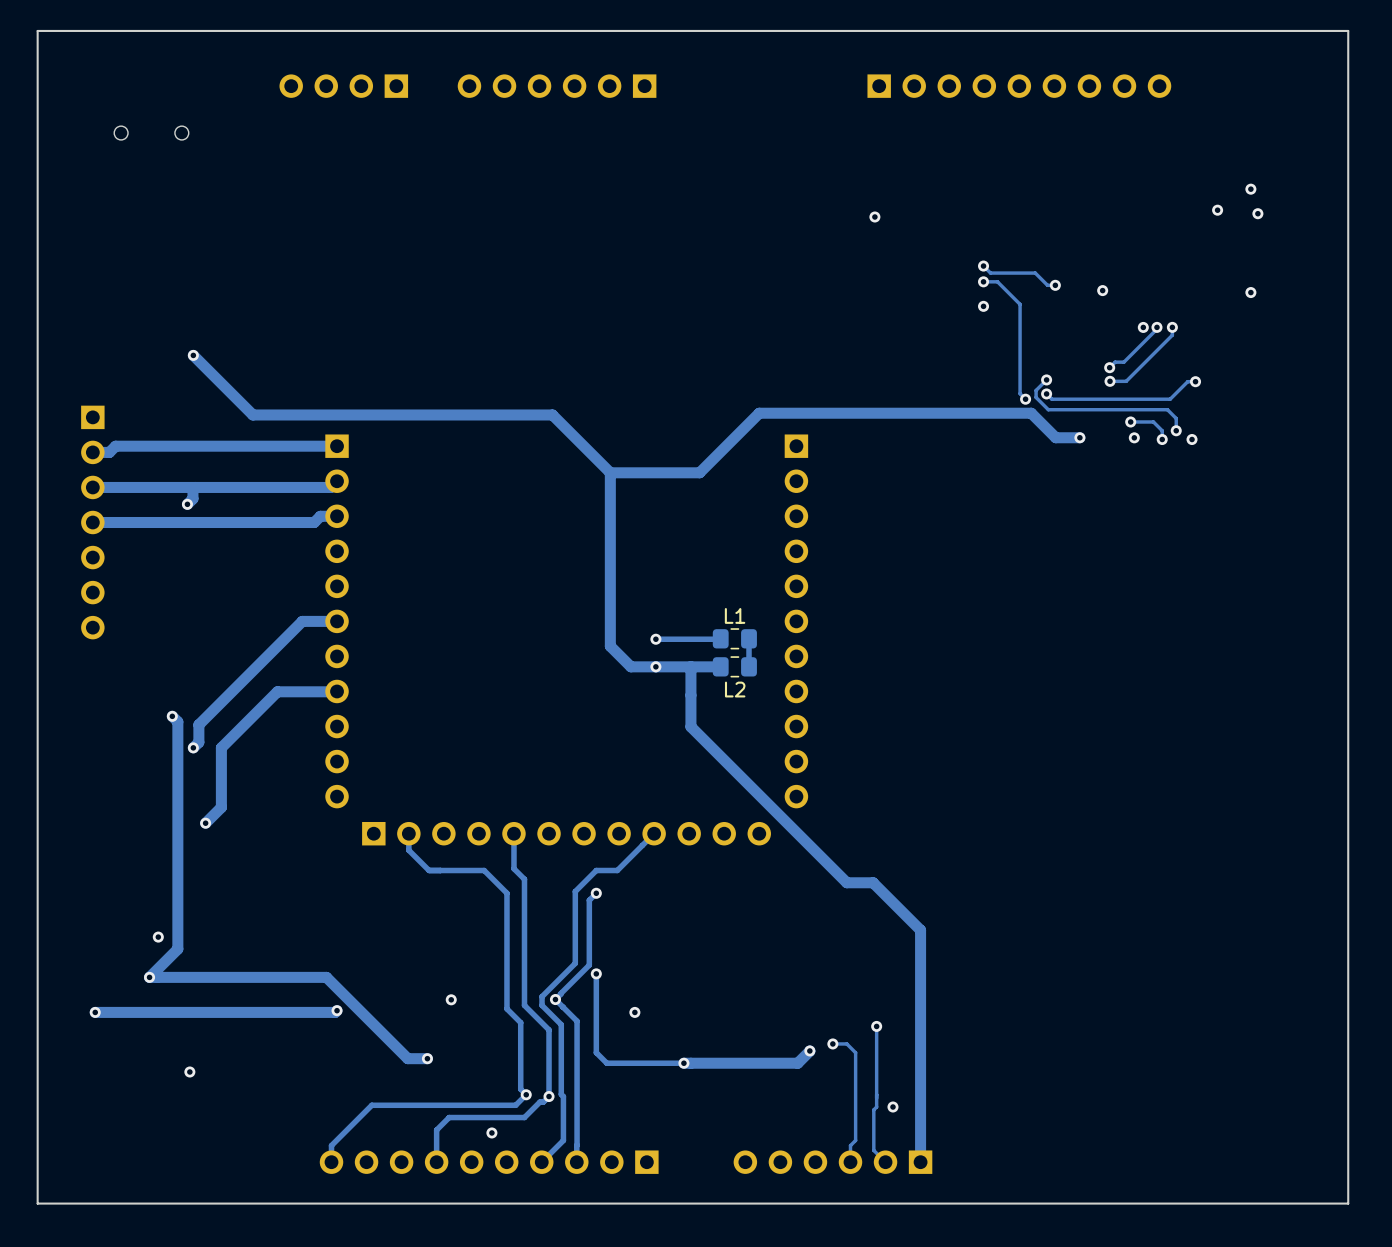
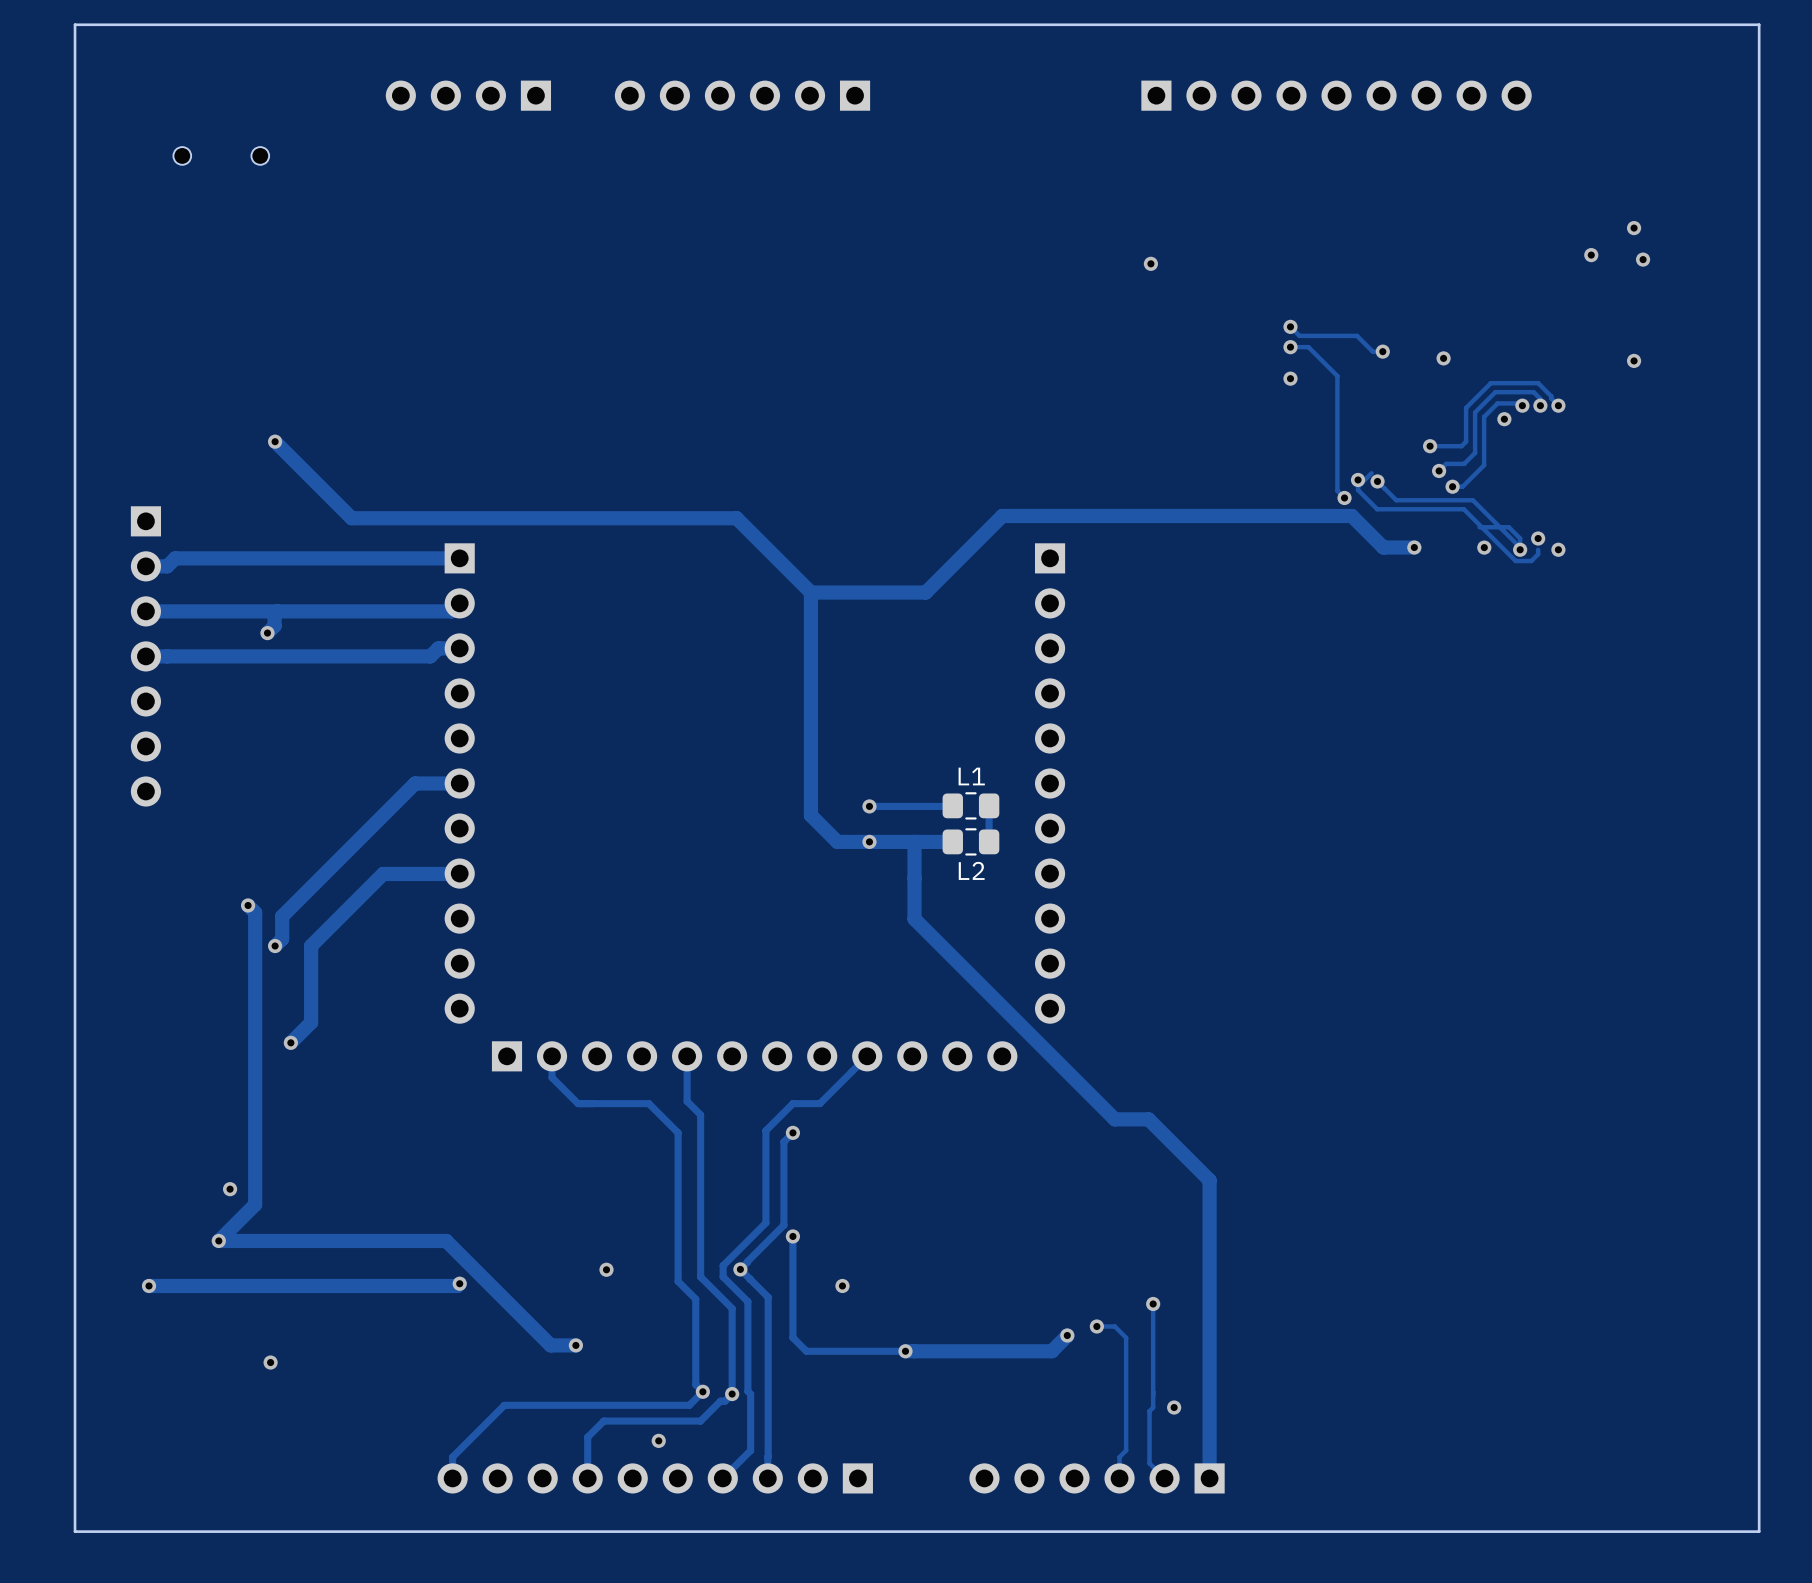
via: (1143, 327) -> none
track: (1156, 327) (1123, 362) (1115, 362) (1109, 367) -> none
via: (1156, 327) -> none
track: none -> (1522, 405) (1520, 403) (1497, 403) (1484, 416) (1484, 465) (1462, 486) (1452, 486)
via: none -> (1522, 405)
track: (1172, 327) (1172, 335) (1126, 381) (1110, 381) -> none
via: (1172, 327) -> none
track: none -> (1540, 405) (1540, 398) (1533, 392) (1495, 392) (1475, 412) (1475, 452) (1464, 463) (1446, 463) (1439, 470)
via: none -> (1540, 405)
track: none -> (1558, 405) (1538, 383) (1490, 383) (1466, 407) (1466, 441) (1461, 446) (1430, 446)
via: none -> (1558, 405)
via: none -> (1504, 419)
via: none -> (1430, 446)
via: (1109, 367) -> none
via: none -> (1439, 470)
via: (1046, 379) -> none
via: (1110, 381) -> none
track: (1195, 381) (1187, 381) (1170, 399) (1051, 399) (1046, 393) -> none
via: (1195, 381) -> none
via: none -> (1358, 479)
track: none -> (1377, 481) (1396, 500) (1472, 500) (1520, 547)
via: none -> (1377, 481)
via: none -> (1452, 486)
track: (1036, 393) (1036, 397) (1048, 409) (1167, 409) (1176, 418) (1176, 430) -> (1358, 490) (1377, 509) (1463, 509) (1515, 561) (1531, 561) (1538, 554) (1538, 549)
via: (1046, 393) -> none
via: (1130, 421) -> none

